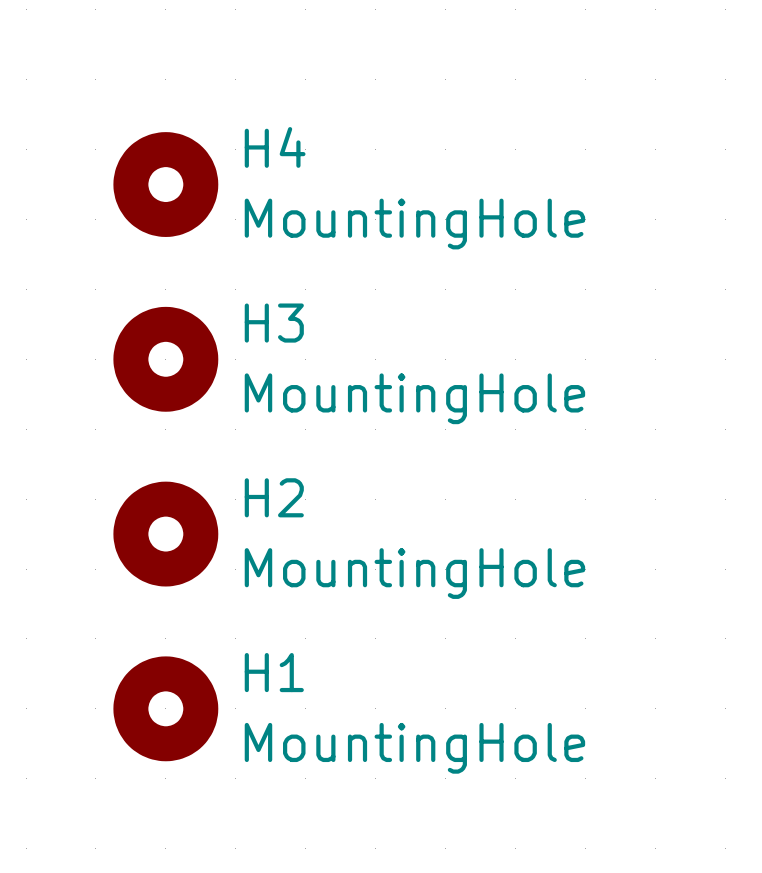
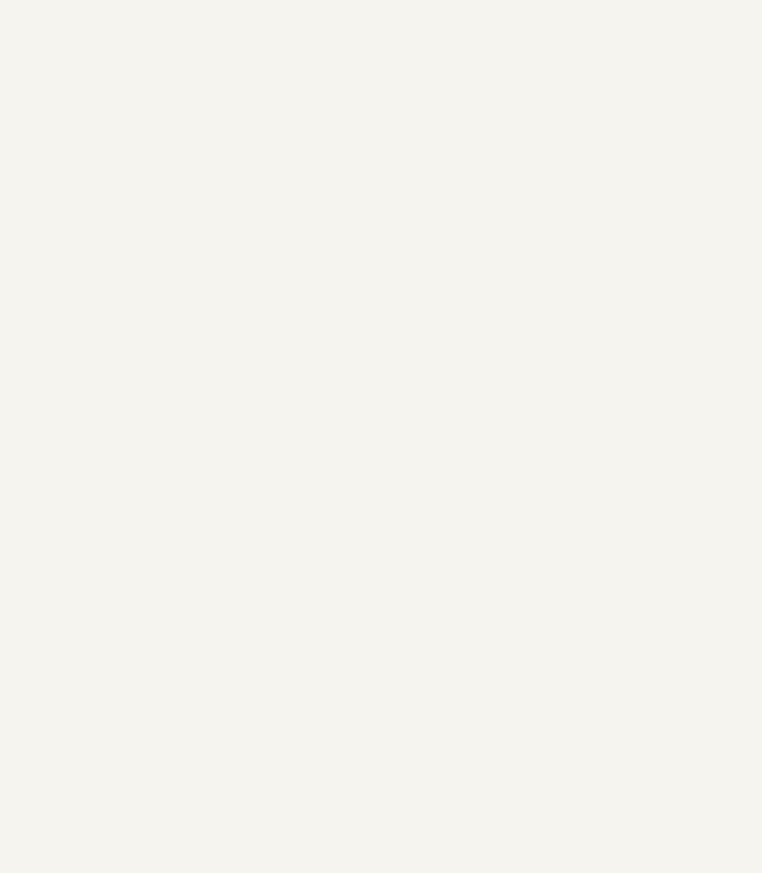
H4: MountingHole (165, 184) -> none
H3: MountingHole (165, 359) -> none
H2: MountingHole (165, 534) -> none
H1: MountingHole (165, 708) -> none

